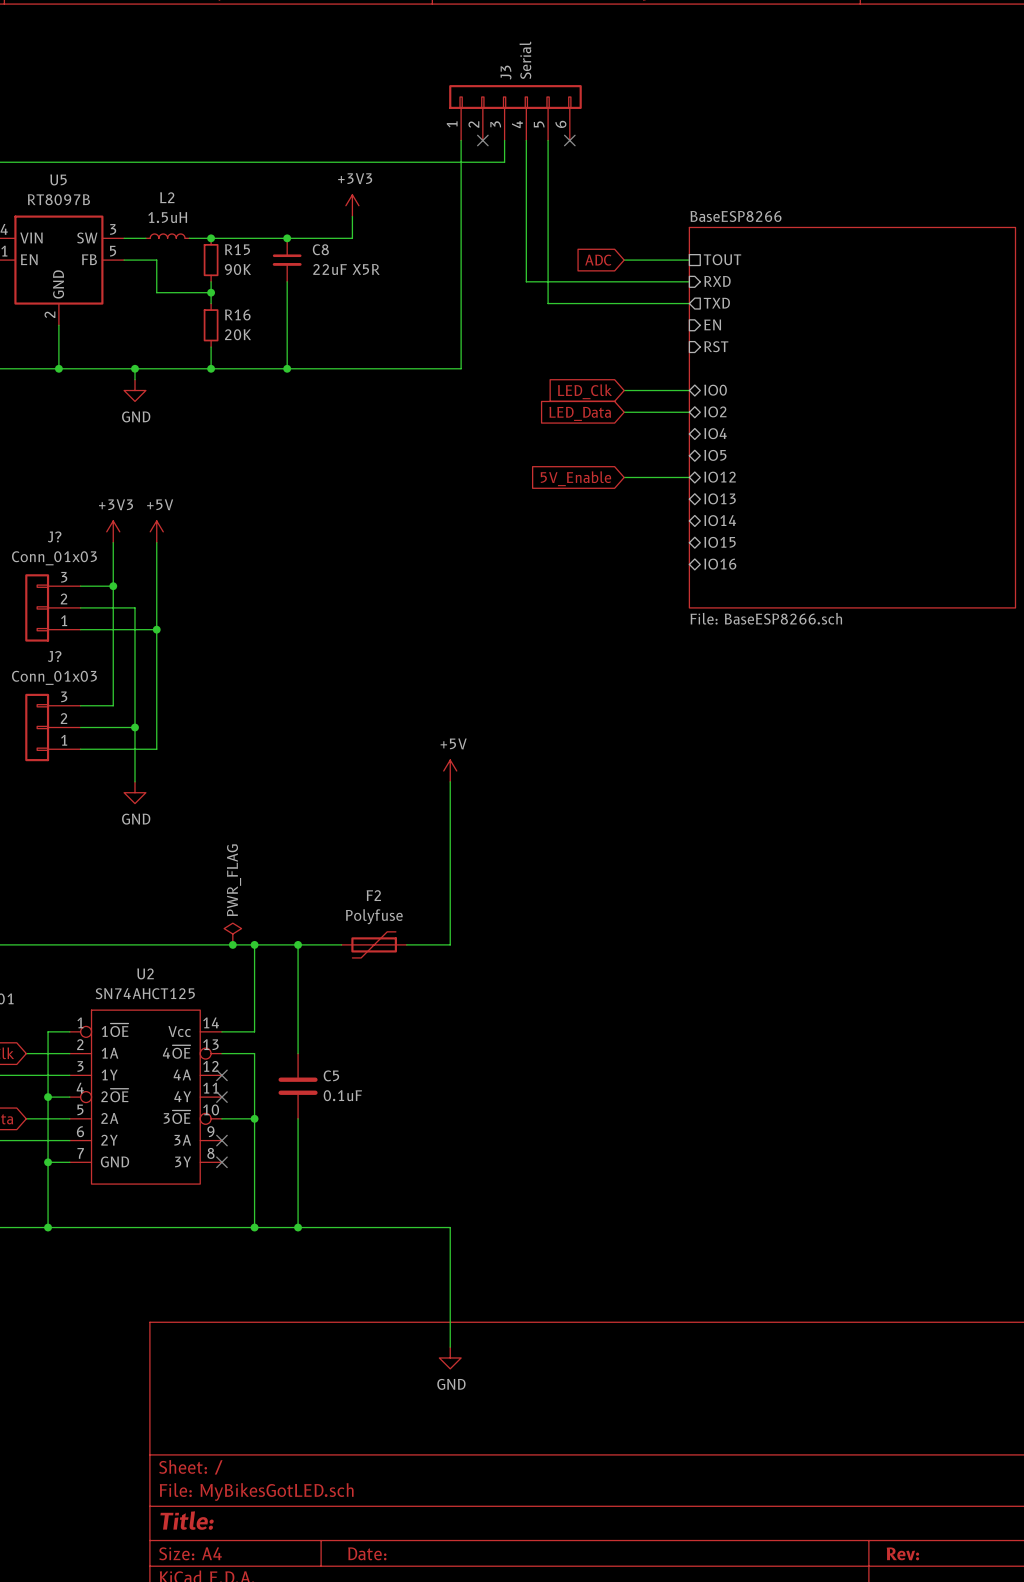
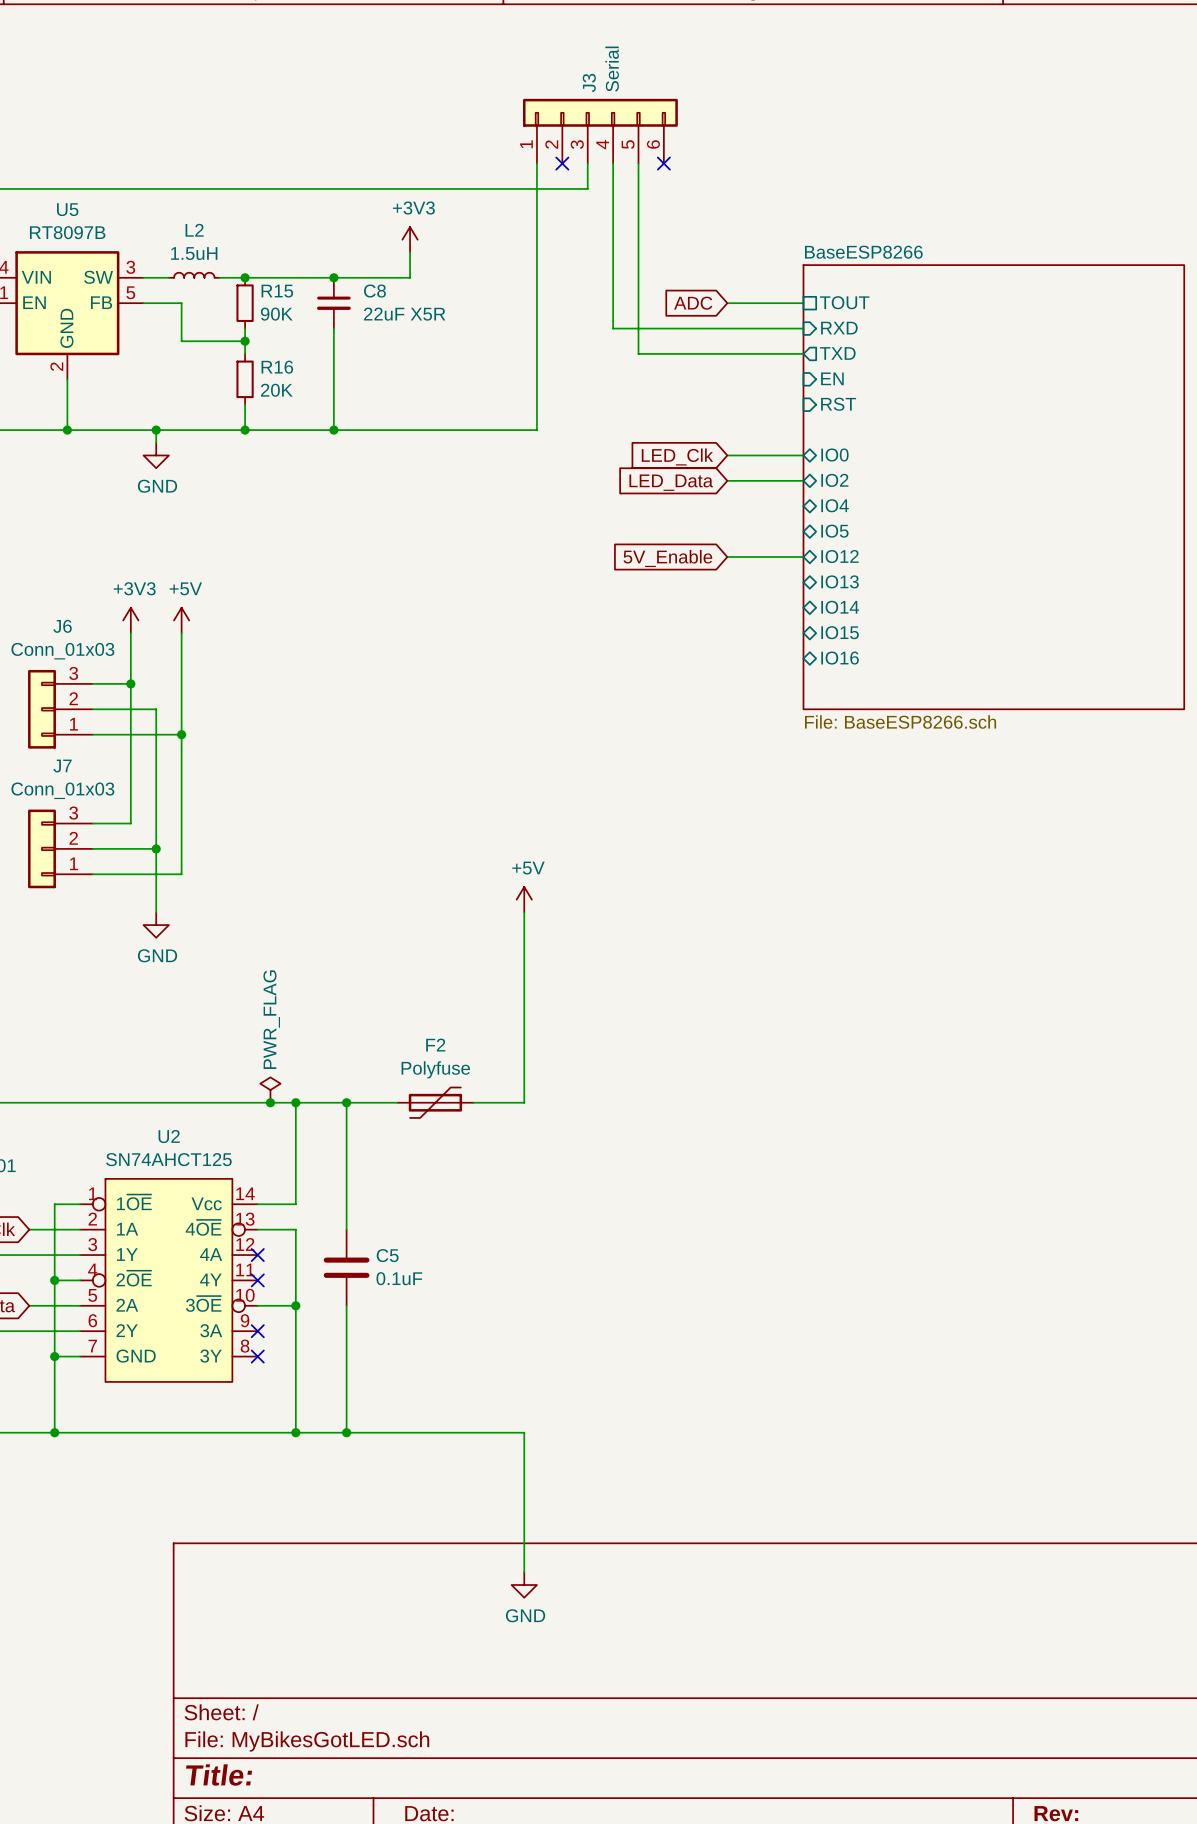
J? name: J? (54, 536) -> J6 (62, 626)
J? name: J? (54, 656) -> J7 (62, 766)

